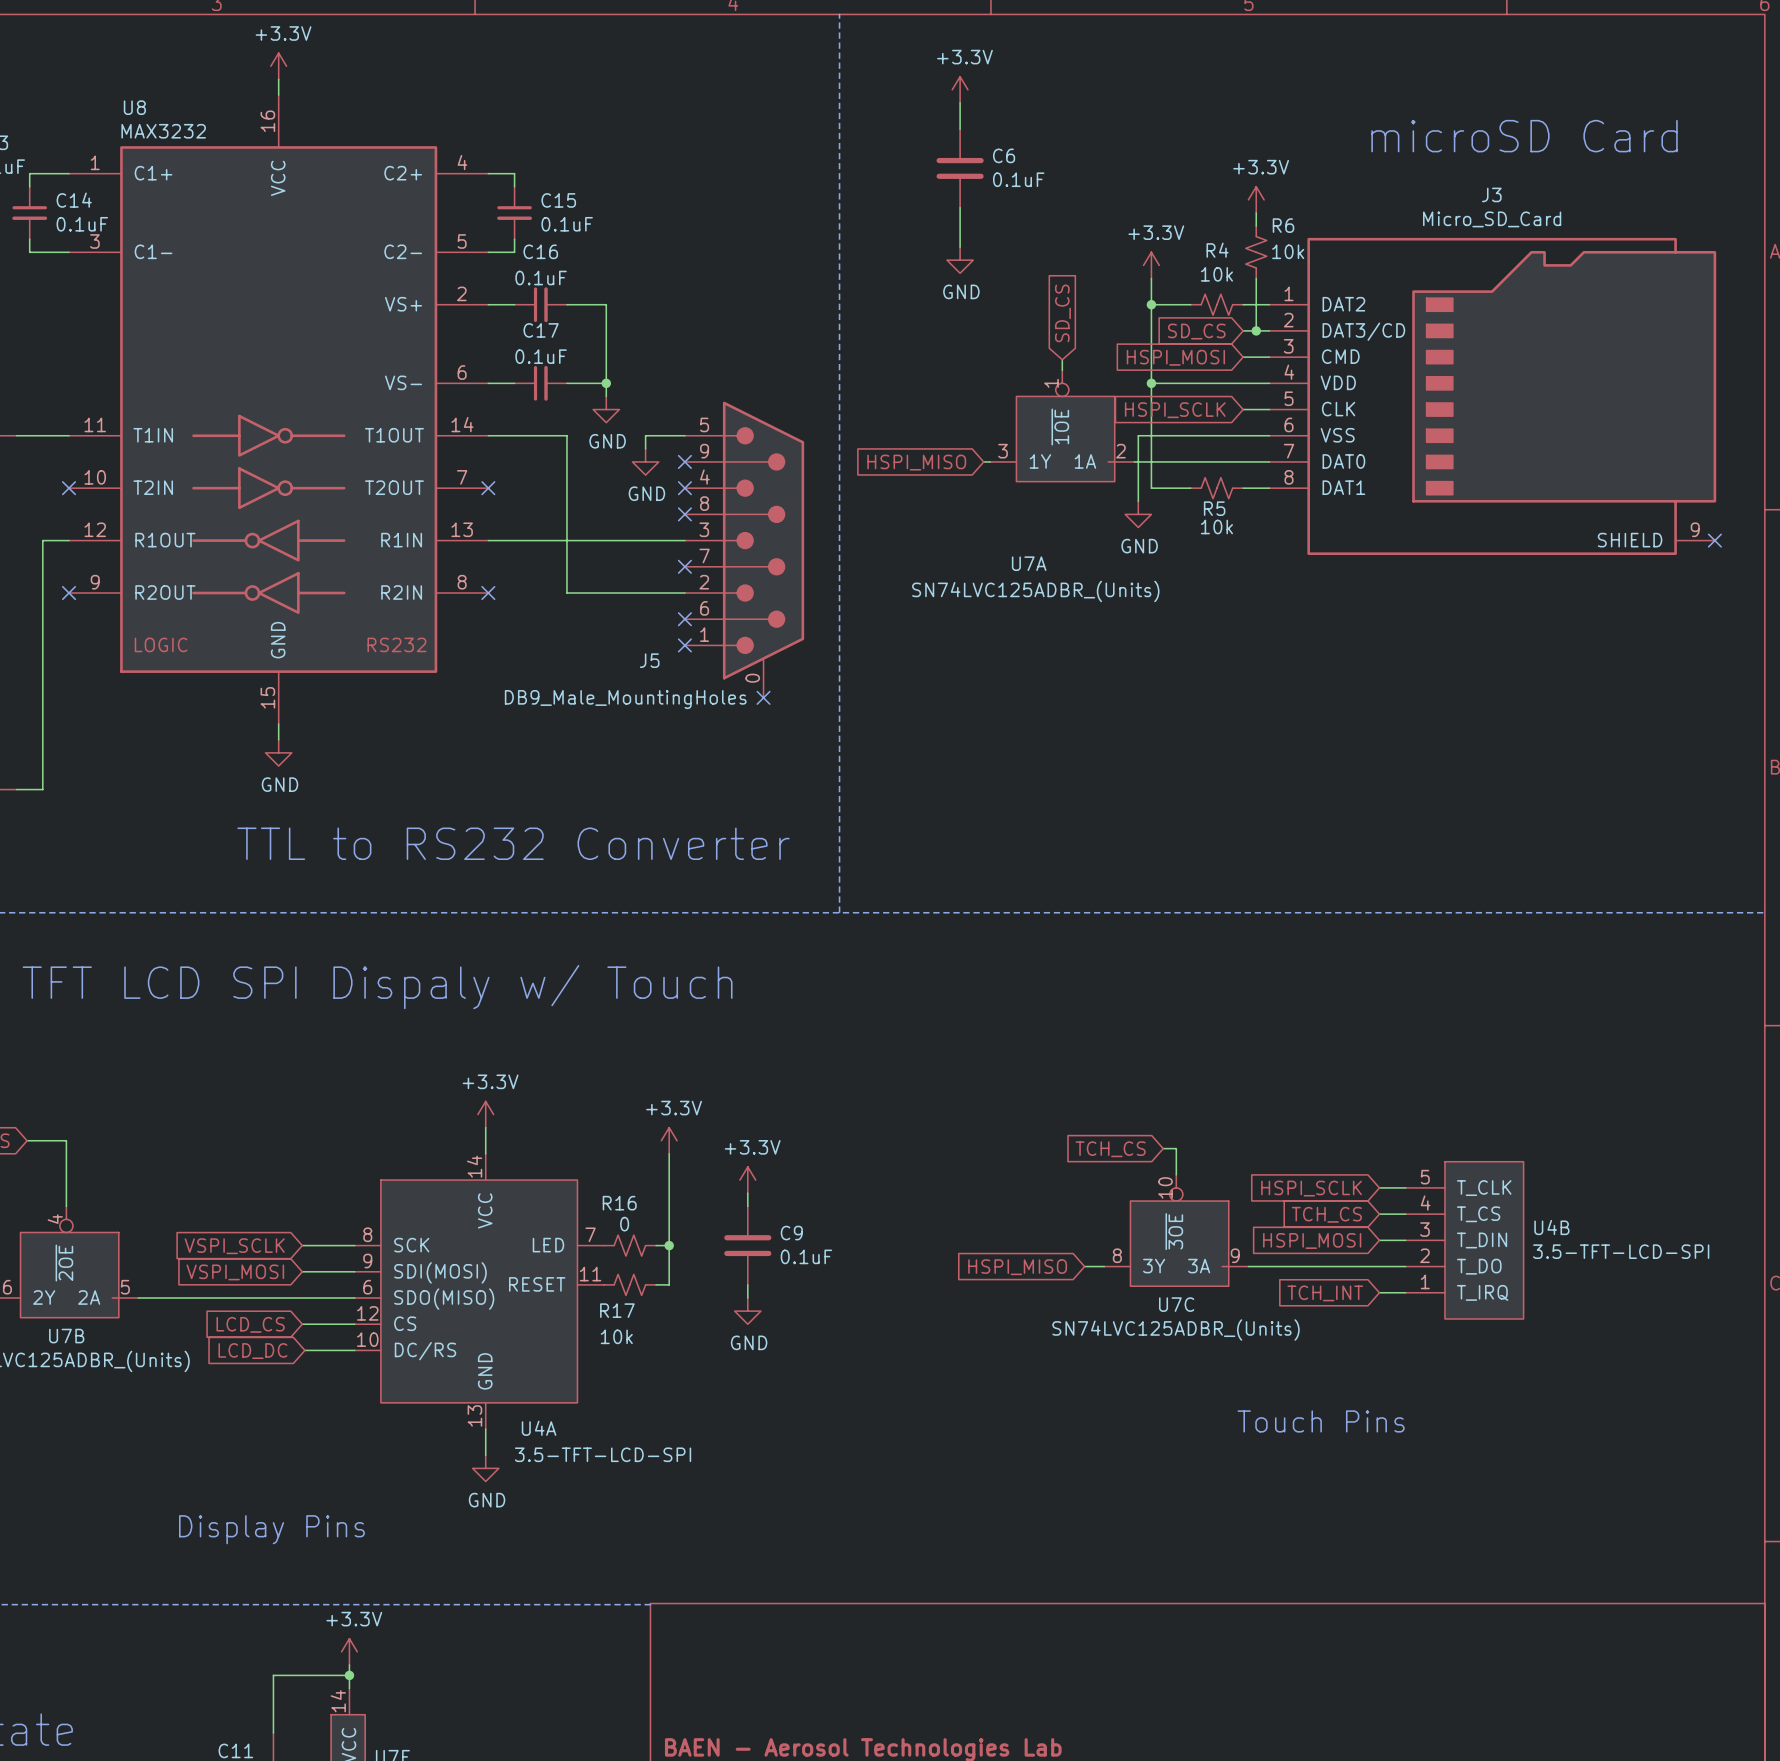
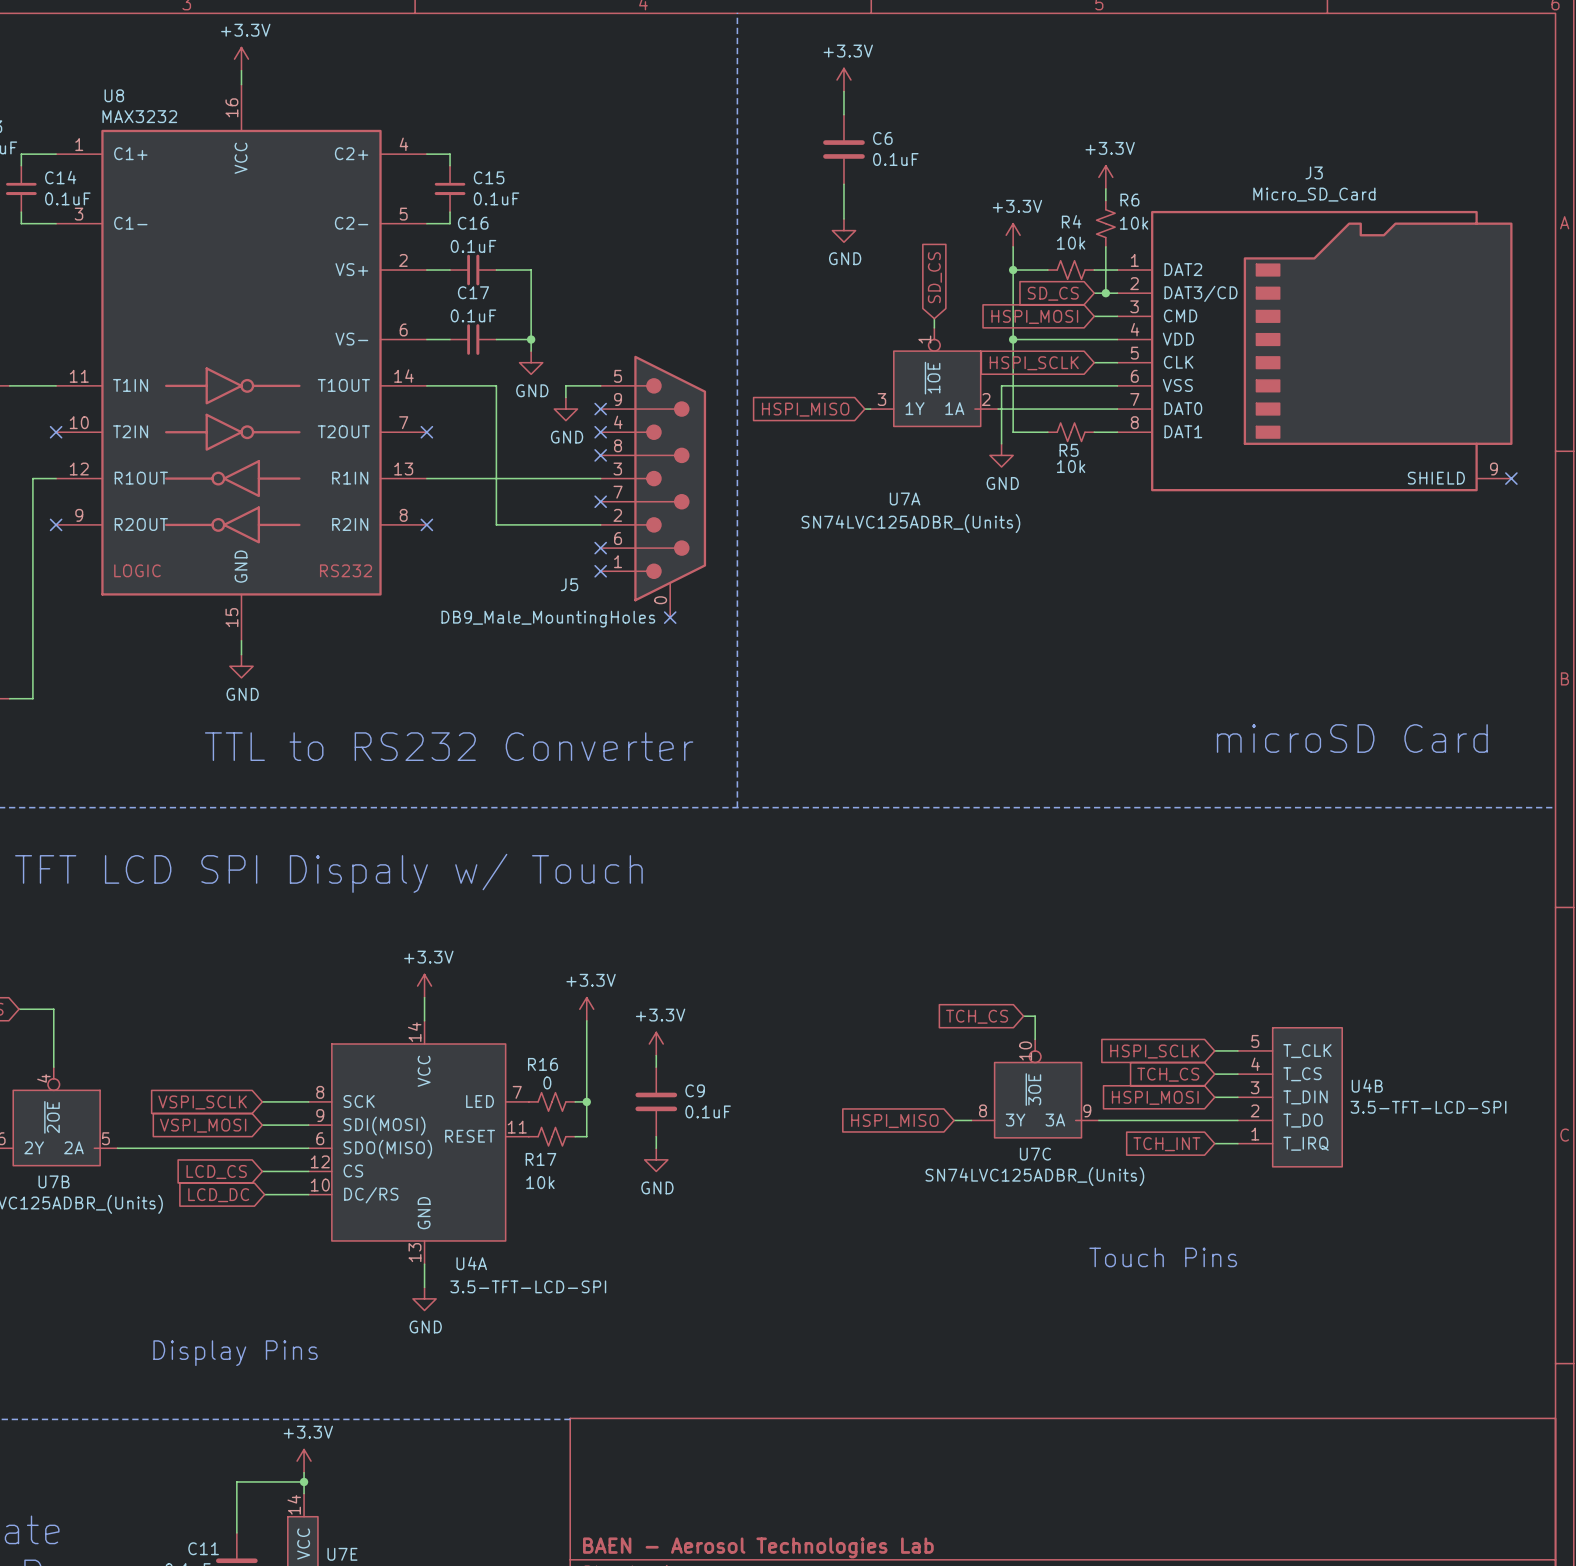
text: microSD Card (1524, 136) -> none
text: none -> microSD Card (1352, 738)

